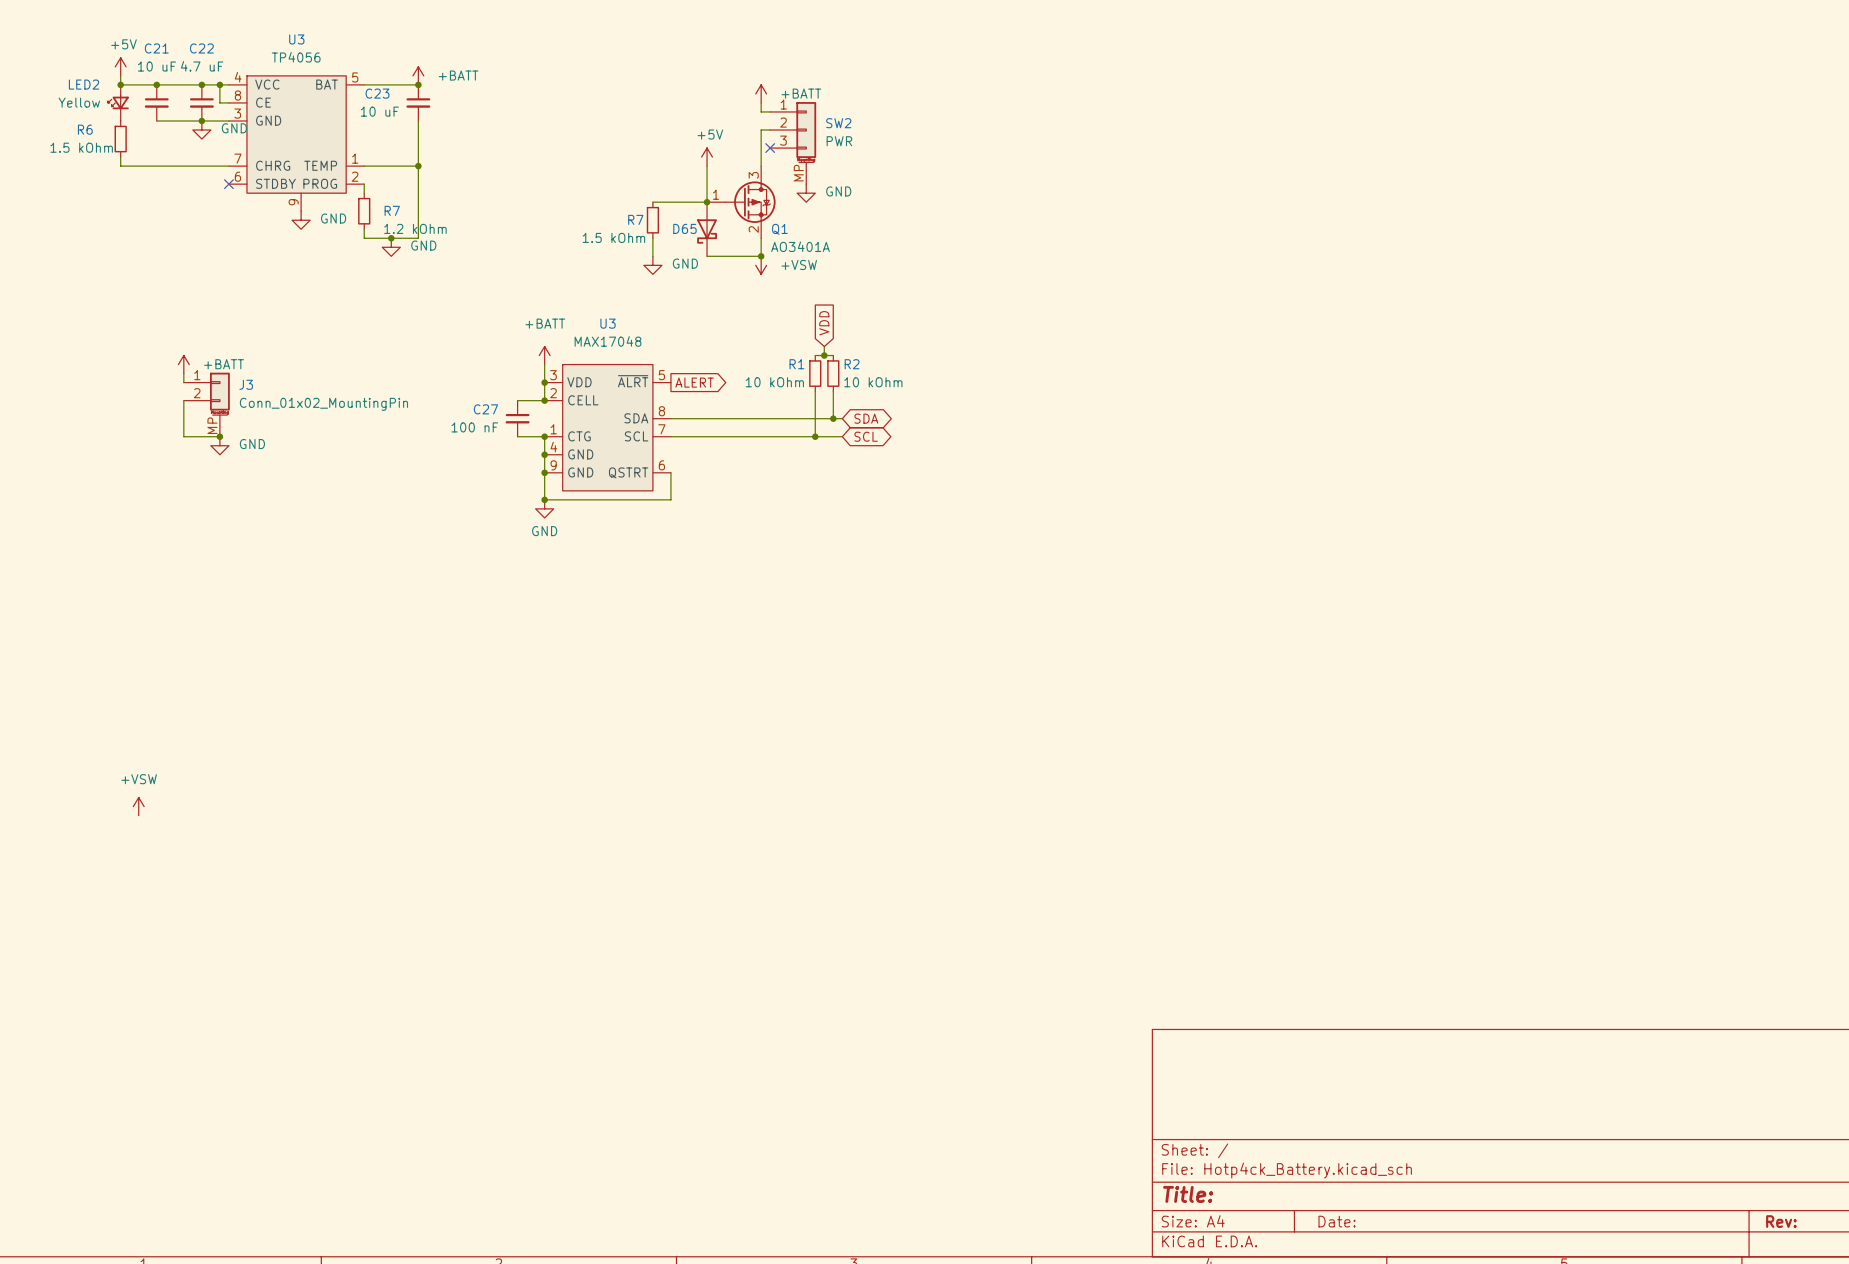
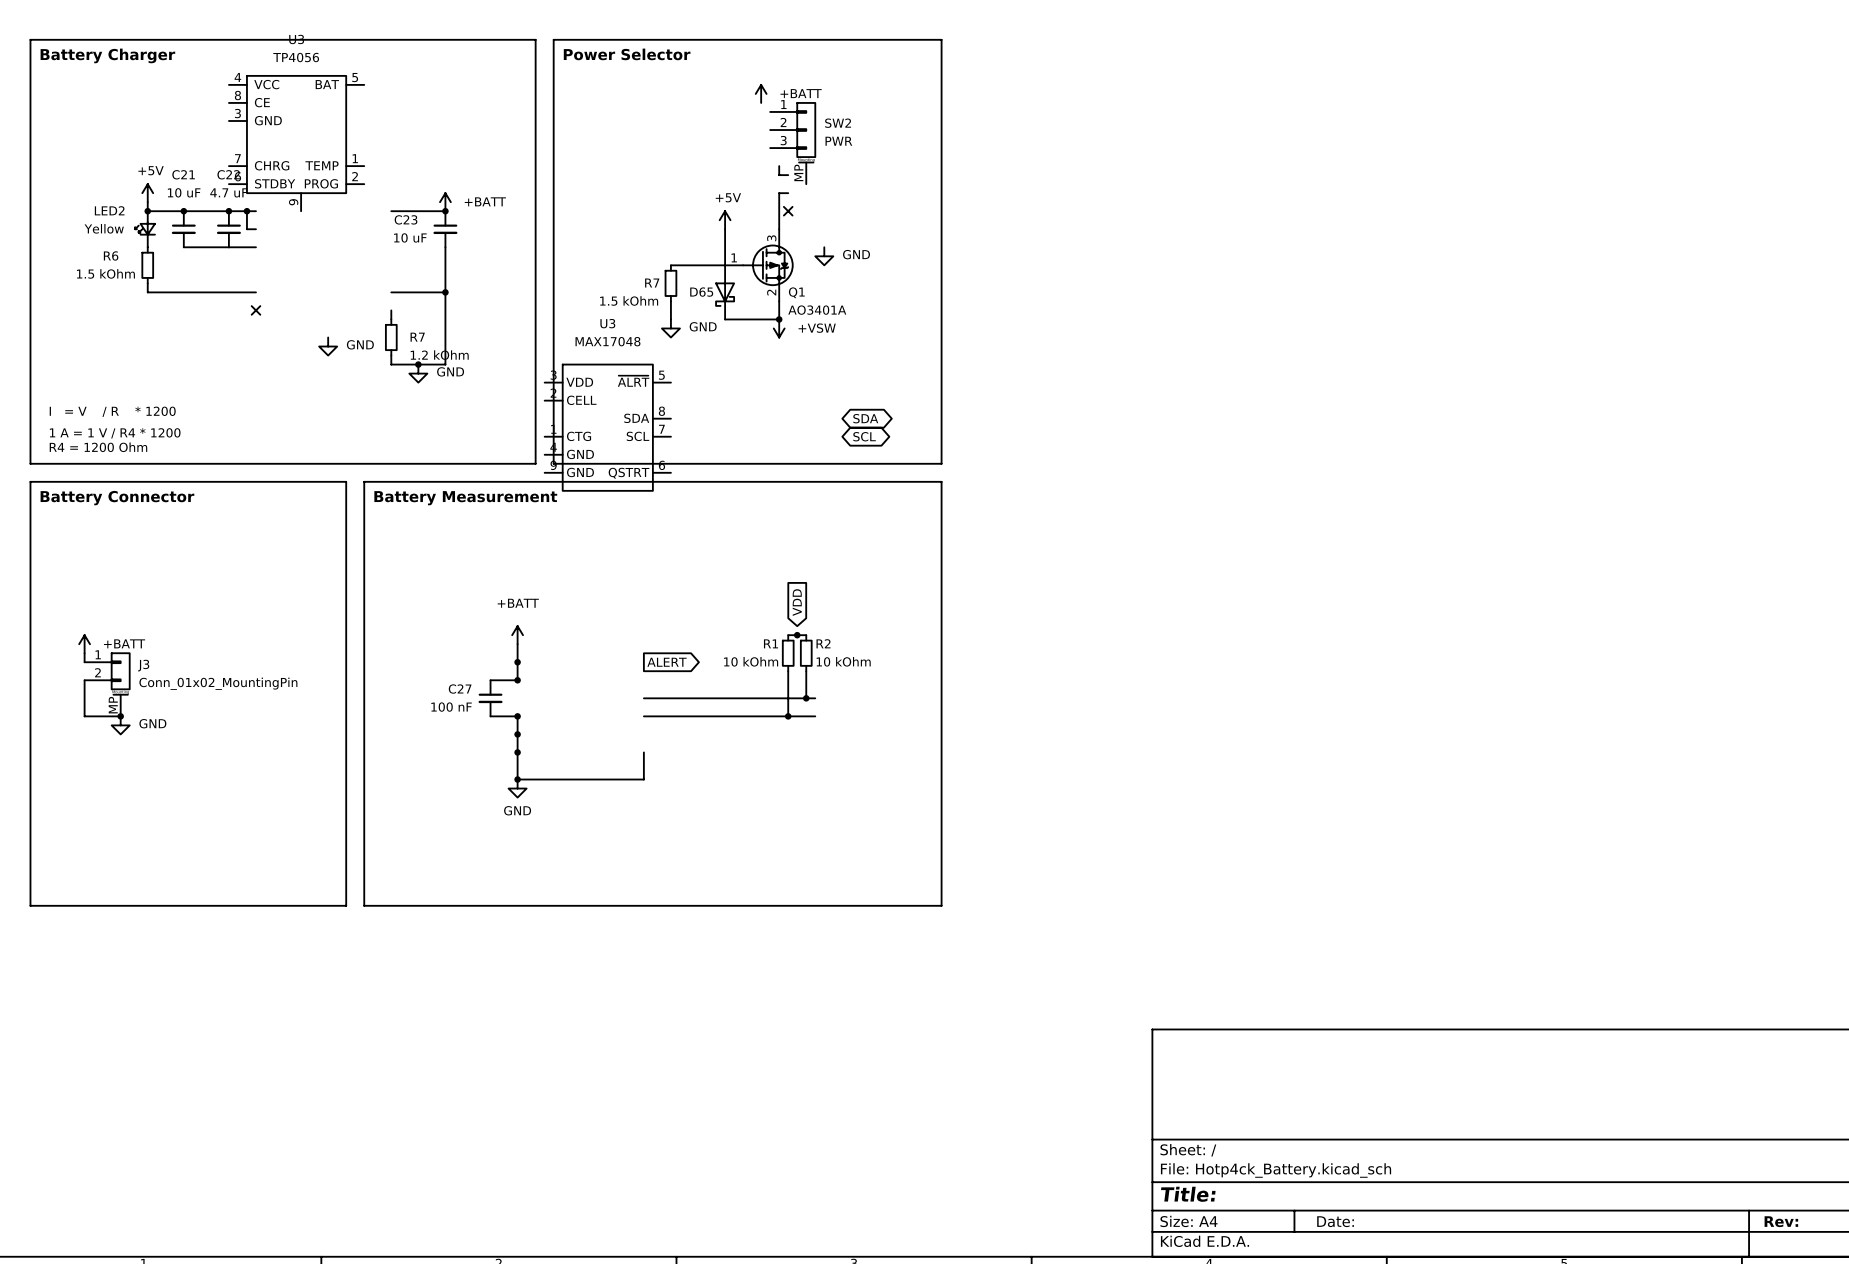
line: none -> (30, 39) (535, 39) (535, 463) (30, 463) (30, 39)
line: none -> (553, 39) (941, 39) (941, 463) (553, 463) (553, 39)
text: none -> Power Selector (627, 54)
text: none -> Battery Charger (107, 55)
power symbol position: +5V (120, 66) -> +5V (147, 193)
wire: (120, 75) (120, 84) (228, 84) -> (147, 202) (147, 211) (255, 211)
power symbol: +BATT (418, 75) -> none
junction: (120, 84) -> none
junction: (156, 84) -> none
junction: (201, 84) -> none
wire: (219, 84) (219, 102) (228, 102) -> (246, 211) (246, 229) (255, 229)
junction: (219, 84) -> none
wire: (364, 84) (418, 84) -> (391, 211) (445, 211)
junction: (418, 84) -> none
LED2 position: (118, 102) -> (145, 229)
C21 position: (156, 102) -> (183, 229)
C22 position: (201, 102) -> (228, 229)
C23 position: (418, 102) -> (445, 229)
wire: (761, 102) (761, 111) (770, 111) -> (779, 166) (779, 175) (788, 175)
wire: (156, 121) (228, 121) -> (183, 247) (255, 247)
junction: (201, 121) -> none
wire: (418, 121) (418, 238) (364, 238) (364, 229) -> (445, 247) (445, 364) (391, 364) (391, 355)
power symbol: GND (201, 130) -> none
wire: (770, 130) (761, 130) (761, 166) -> (788, 193) (779, 193) (779, 229)
R6 position: (120, 139) -> (147, 265)
no-connect mark: (770, 148) -> none
wire: (120, 157) (120, 166) (228, 166) -> (147, 283) (147, 292) (255, 292)
power symbol position: +5V (707, 157) -> +5V (725, 220)
wire: (364, 166) (418, 166) -> (391, 292) (445, 292)
junction: (418, 166) -> none
wire: (707, 166) (707, 202) (652, 202) -> (725, 229) (725, 265) (670, 265)
no-connect mark: (228, 184) -> none
wire: (364, 184) (364, 193) -> (391, 310) (391, 319)
power symbol position: GND (806, 193) -> GND (824, 256)
power symbol: none -> +BATT (445, 202)
junction: (707, 202) -> none
Q1 position: (741, 202) -> (759, 265)
junction: none -> (147, 211)
junction: none -> (183, 211)
junction: none -> (228, 211)
junction: none -> (246, 211)
R7 position: (364, 211) -> (391, 337)
junction: none -> (445, 211)
no-connect mark: none -> (788, 211)
power symbol: GND (301, 220) -> none
R7 position: (652, 220) -> (670, 283)
D65 position: (707, 229) -> (725, 292)
junction: (391, 238) -> none
wire: (652, 238) (652, 256) -> (670, 301) (670, 319)
wire: (761, 238) (761, 256) (707, 256) -> (779, 301) (779, 319) (725, 319)
power symbol: GND (391, 247) -> none
junction: (761, 256) -> none
power symbol position: GND (652, 265) -> GND (670, 328)
power symbol position: +VSW (761, 265) -> +VSW (779, 328)
junction: none -> (445, 292)
no-connect mark: none -> (255, 310)
junction: none -> (779, 319)
global label: VDD (824, 323) -> none
power symbol: none -> GND (328, 346)
wire: (824, 346) (824, 355) -> none
power symbol: +BATT (544, 355) -> none
wire: (815, 355) (833, 355) -> none
junction: (824, 355) -> none
power symbol: +BATT (183, 364) -> none
junction: none -> (418, 364)
wire: (544, 364) (544, 400) (517, 400) -> none
wire: (183, 373) (183, 382) -> none
power symbol: none -> GND (418, 373)
R1 position: (815, 373) -> (788, 653)
R2 position: (833, 373) -> (806, 653)
junction: (544, 382) -> none
global label: ALERT (694, 382) -> none
wire: (815, 391) (815, 436) -> none
wire: (833, 391) (833, 418) -> none
wire: (183, 400) (183, 436) (219, 436) -> none
junction: (544, 400) -> none
J3 position: (206, 404) -> (107, 684)
text: none -> I = V / R * 1200 (112, 411)
C27 position: (517, 418) -> (490, 698)
wire: (670, 418) (842, 418) -> none
junction: (833, 418) -> none
text: none -> 1 A = 1 V / R4 * 1200 (115, 433)
junction: (219, 436) -> none
wire: (517, 436) (544, 436) (544, 499) (670, 499) (670, 472) -> none
junction: (544, 436) -> none
wire: (670, 436) (842, 436) -> none
junction: (815, 436) -> none
power symbol: GND (219, 445) -> none
text: none -> R4 = 1200 Ohm (98, 447)
junction: (544, 454) -> none
junction: (544, 472) -> none
line: none -> (30, 481) (30, 905) (346, 905) (346, 481) (30, 481)
line: none -> (364, 481) (941, 481) (941, 905) (364, 905) (364, 481)
text: none -> Battery Connector (117, 498)
text: none -> Battery Measurement (465, 498)
junction: (544, 499) -> none
power symbol: GND (544, 508) -> none
global label: none -> VDD (797, 602)
power symbol: none -> +BATT (517, 635)
wire: none -> (788, 635) (806, 635)
junction: none -> (797, 635)
power symbol: none -> +BATT (84, 644)
wire: none -> (517, 644) (517, 680) (490, 680)
wire: none -> (84, 653) (84, 662)
junction: none -> (517, 662)
global label: none -> ALERT (667, 662)
wire: none -> (788, 671) (788, 716)
wire: none -> (806, 671) (806, 698)
wire: none -> (84, 680) (84, 716) (120, 716)
junction: none -> (517, 680)
wire: none -> (643, 698) (815, 698)
junction: none -> (806, 698)
junction: none -> (120, 716)
wire: none -> (490, 716) (517, 716) (517, 779) (643, 779) (643, 752)
junction: none -> (517, 716)
wire: none -> (643, 716) (815, 716)
junction: none -> (788, 716)
power symbol: none -> GND (120, 725)
junction: none -> (517, 734)
junction: none -> (517, 752)
junction: none -> (517, 779)
power symbol: none -> GND (517, 788)
power symbol: +VSW (138, 806) -> none

